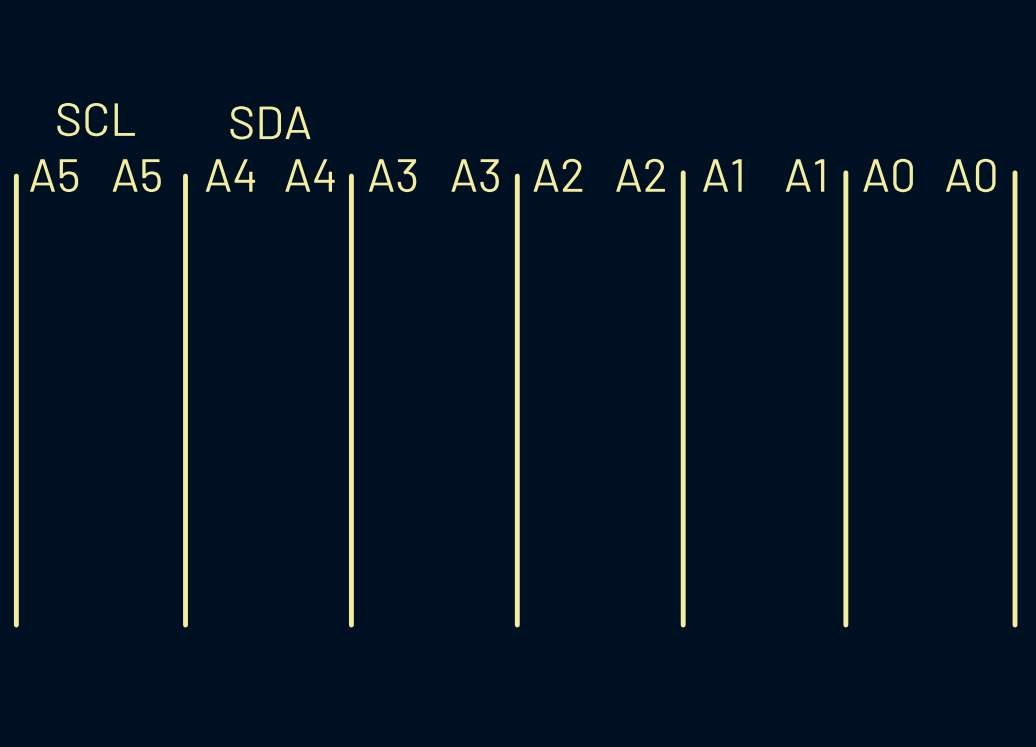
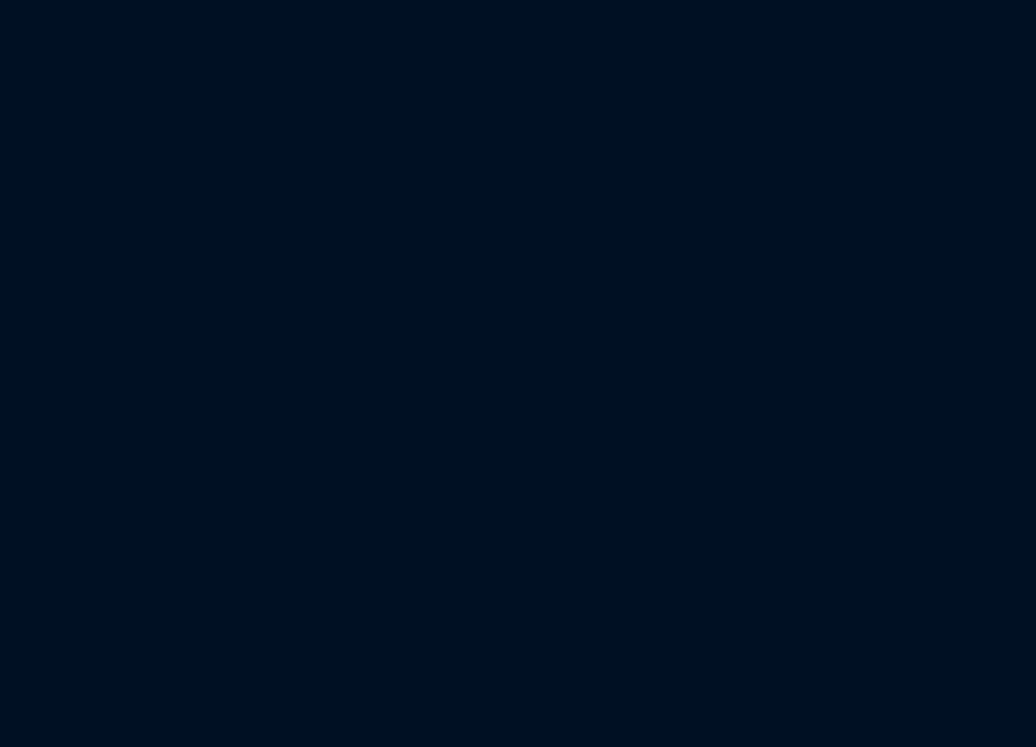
text: SCL (96, 119) -> none
text: SDA (270, 122) -> none
line: (683, 172) (683, 625) -> none
line: (845, 172) (845, 625) -> none
line: (1015, 172) (1015, 625) -> none
text: A5 (54, 175) -> none
text: A5 (136, 175) -> none
text: A4 (230, 175) -> none
text: A4 (309, 175) -> none
text: A3 (392, 175) -> none
text: A3 (475, 175) -> none
text: A2 (557, 175) -> none
text: A2 (640, 175) -> none
text: A1 (722, 175) -> none
text: A1 (804, 175) -> none
text: A0 (888, 175) -> none
text: A0 (970, 175) -> none
line: (16, 176) (16, 625) -> none
line: (185, 176) (185, 625) -> none
line: (351, 176) (351, 625) -> none
line: (517, 176) (517, 625) -> none

